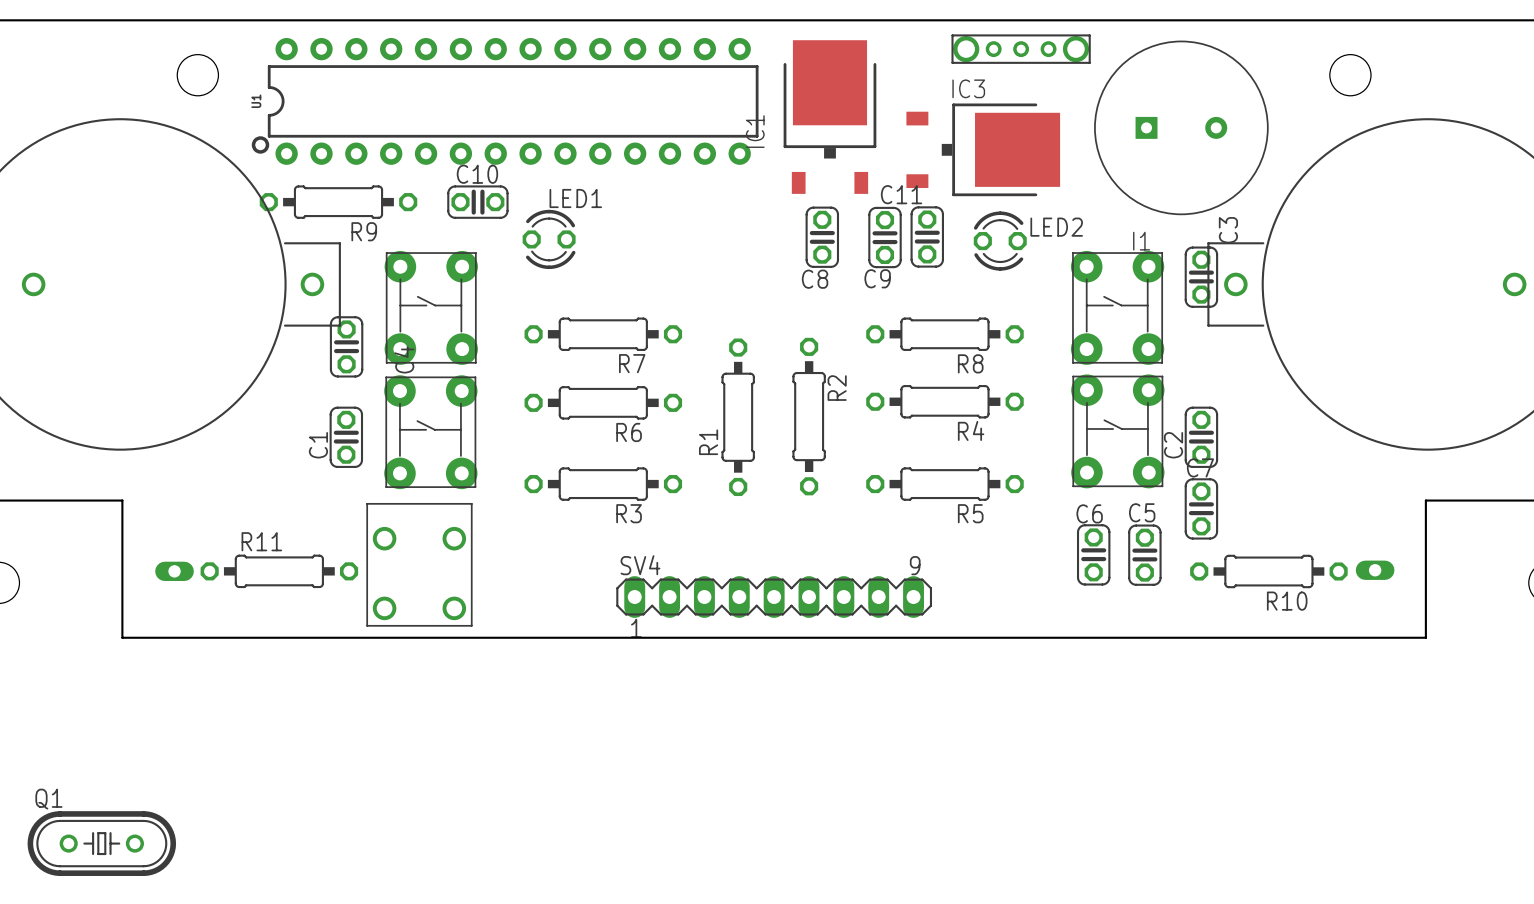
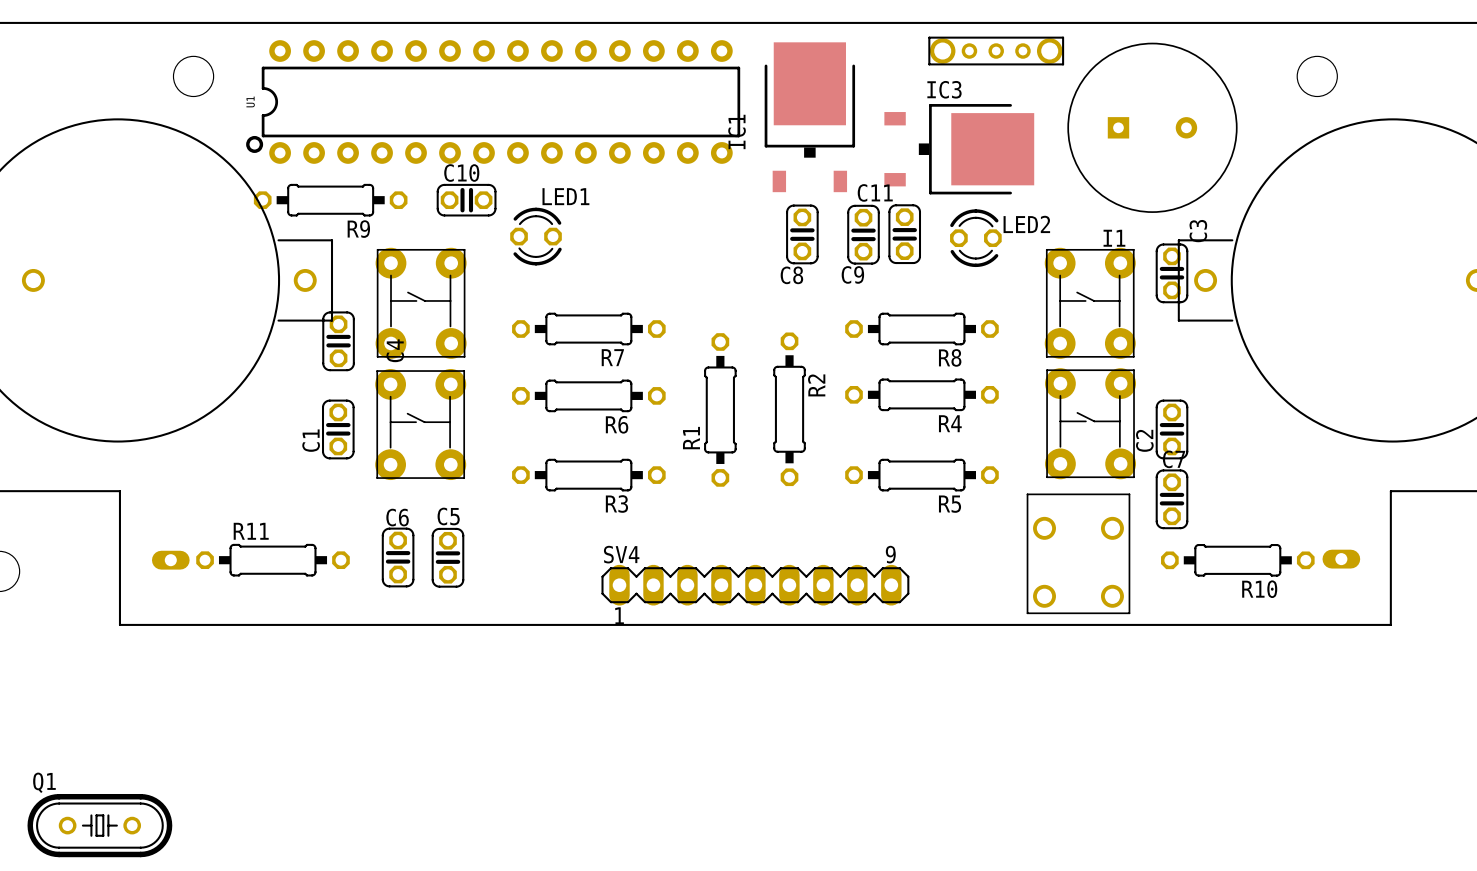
C6 position: (1093, 554) -> (398, 557)
C5 position: (1144, 555) -> (447, 557)
part: (419, 564) -> none
part: none -> (1078, 553)

